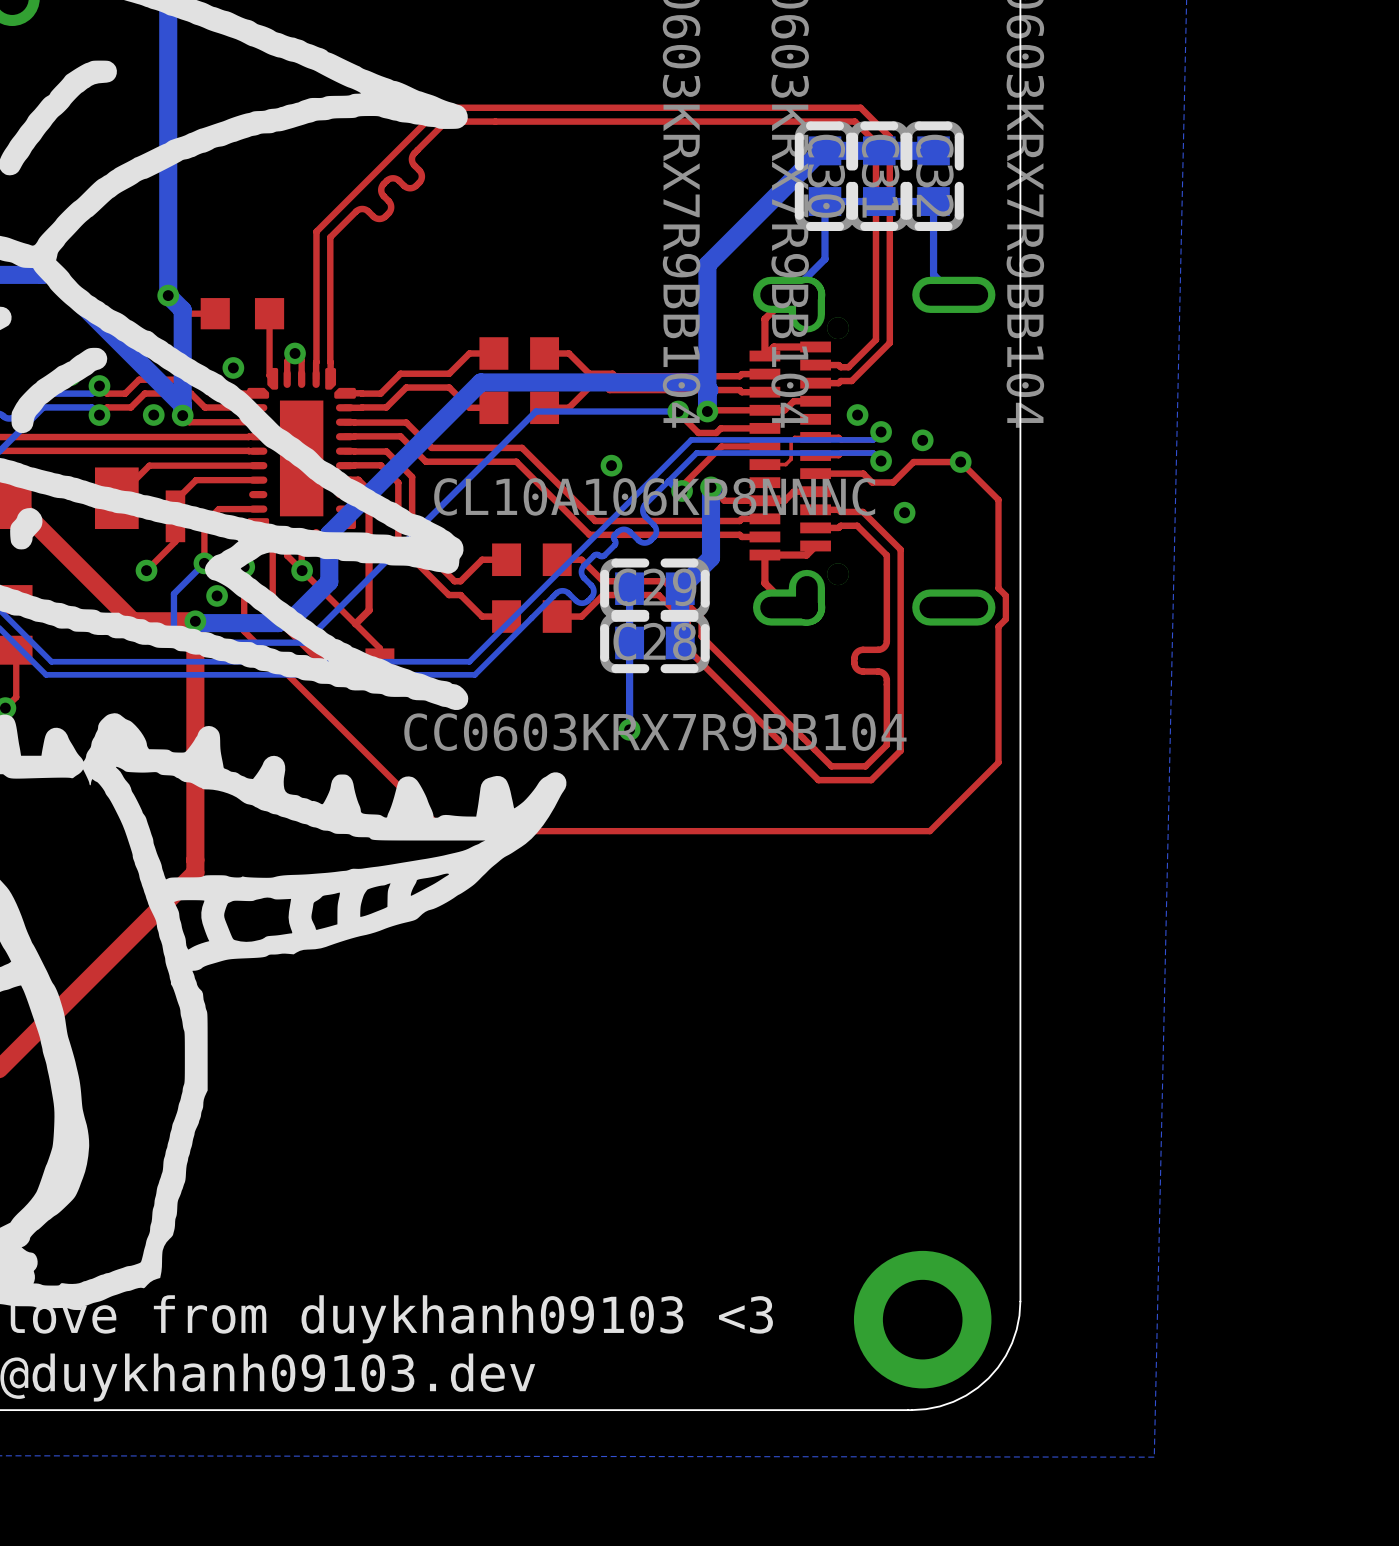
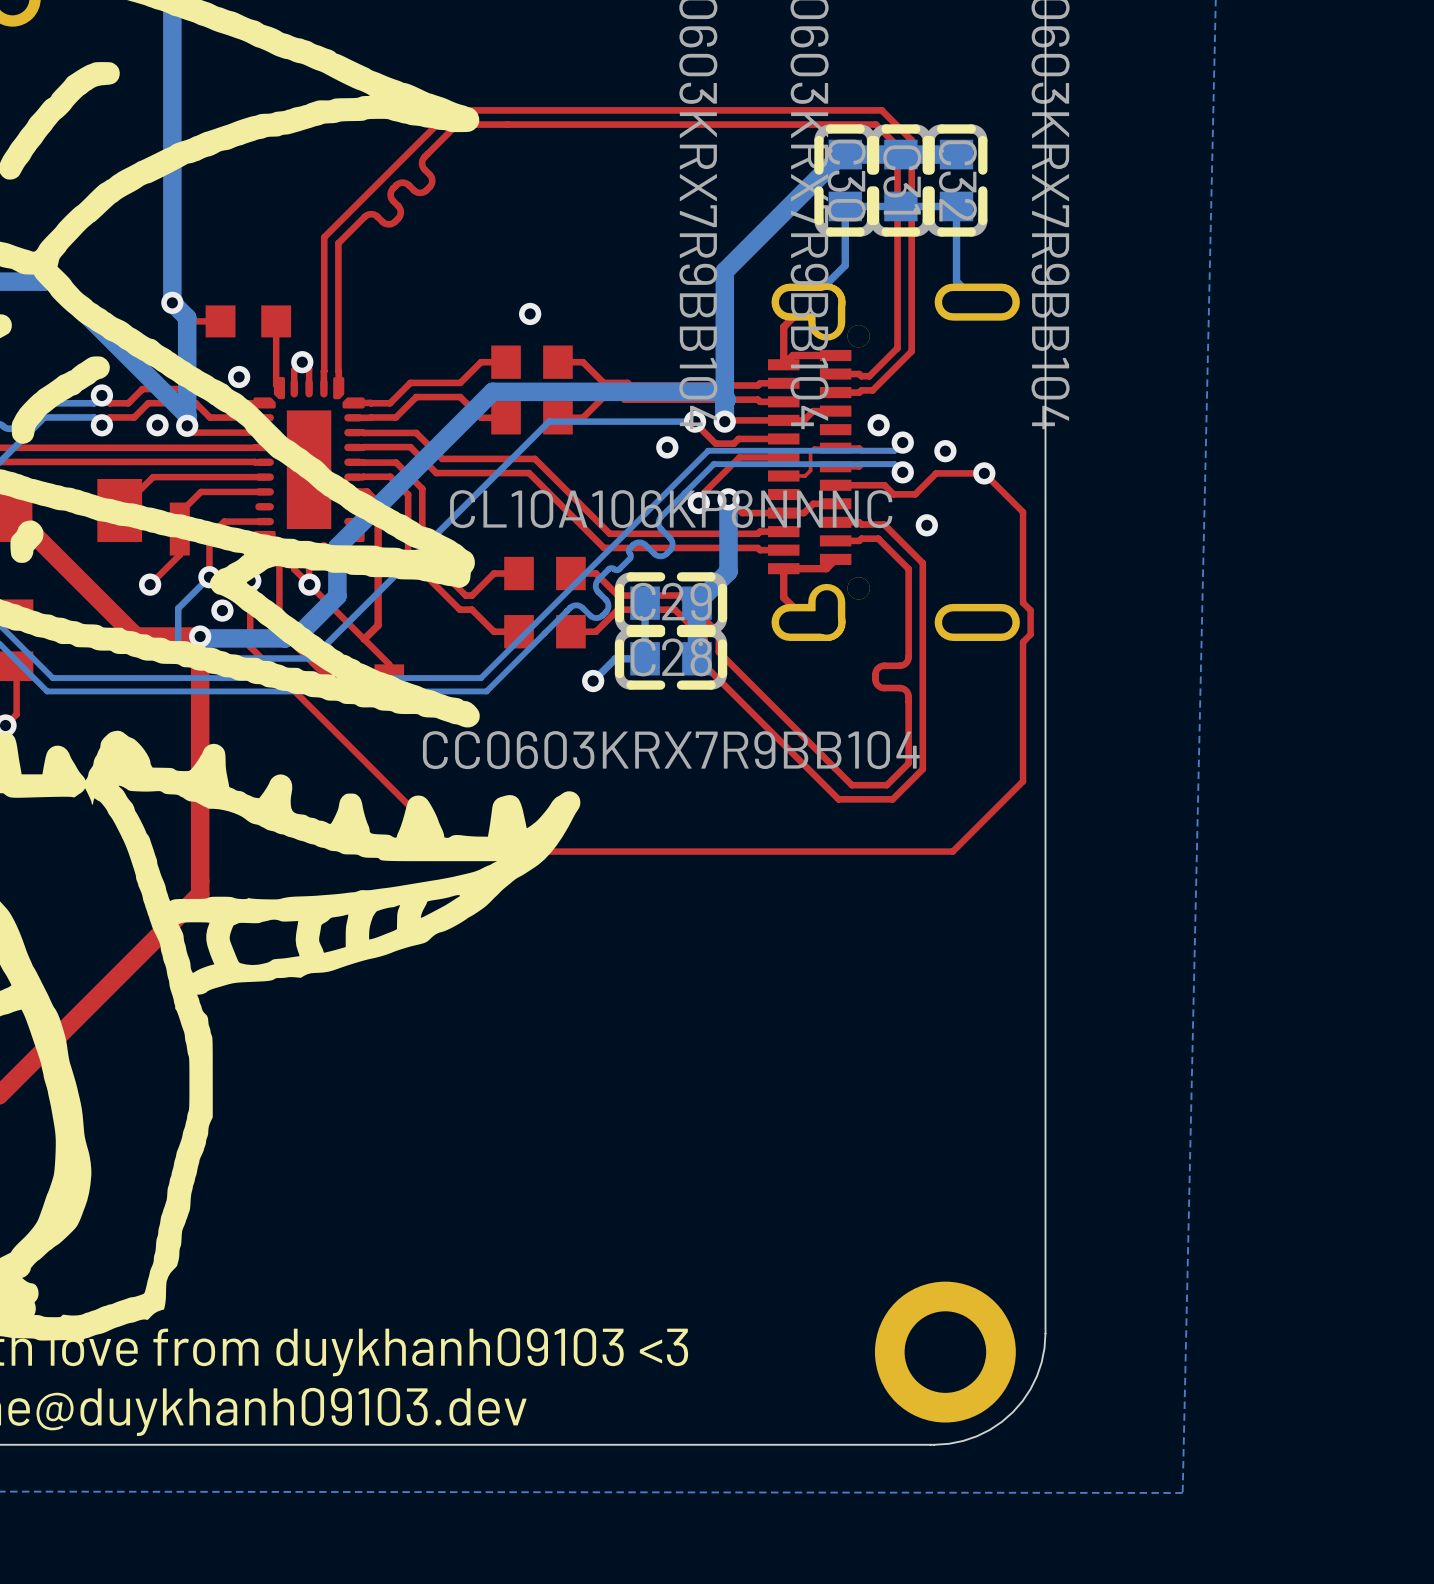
via: none -> (530, 313)
via position: (611, 465) -> (667, 447)
bottom track: (629, 642) (629, 729) -> (645, 658) (615, 658) (593, 681)
via position: (629, 729) -> (593, 681)

